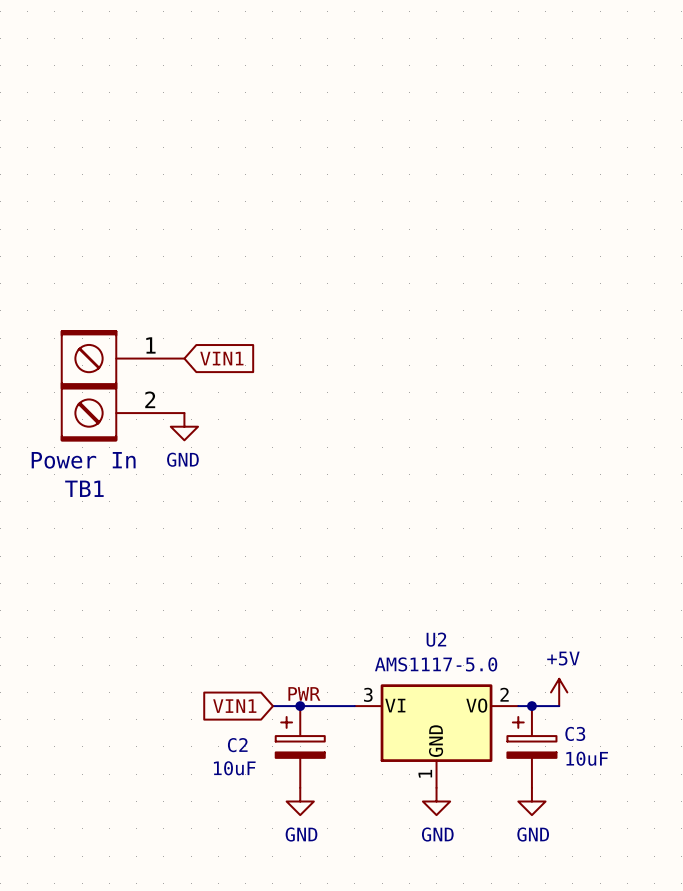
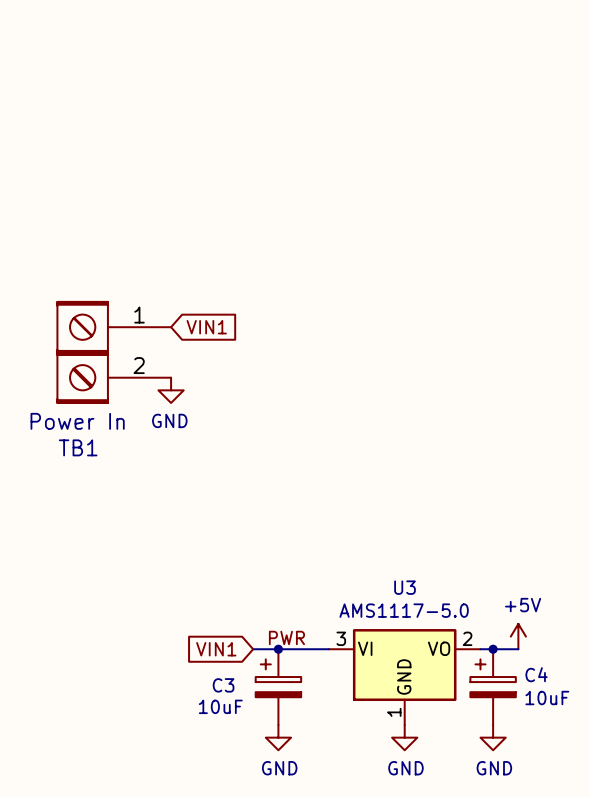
U2 name: U2 (436, 639) -> U3 (405, 587)
C3 name: C3 (575, 733) -> C4 (536, 674)
C2 name: C2 (237, 745) -> C3 (223, 685)

